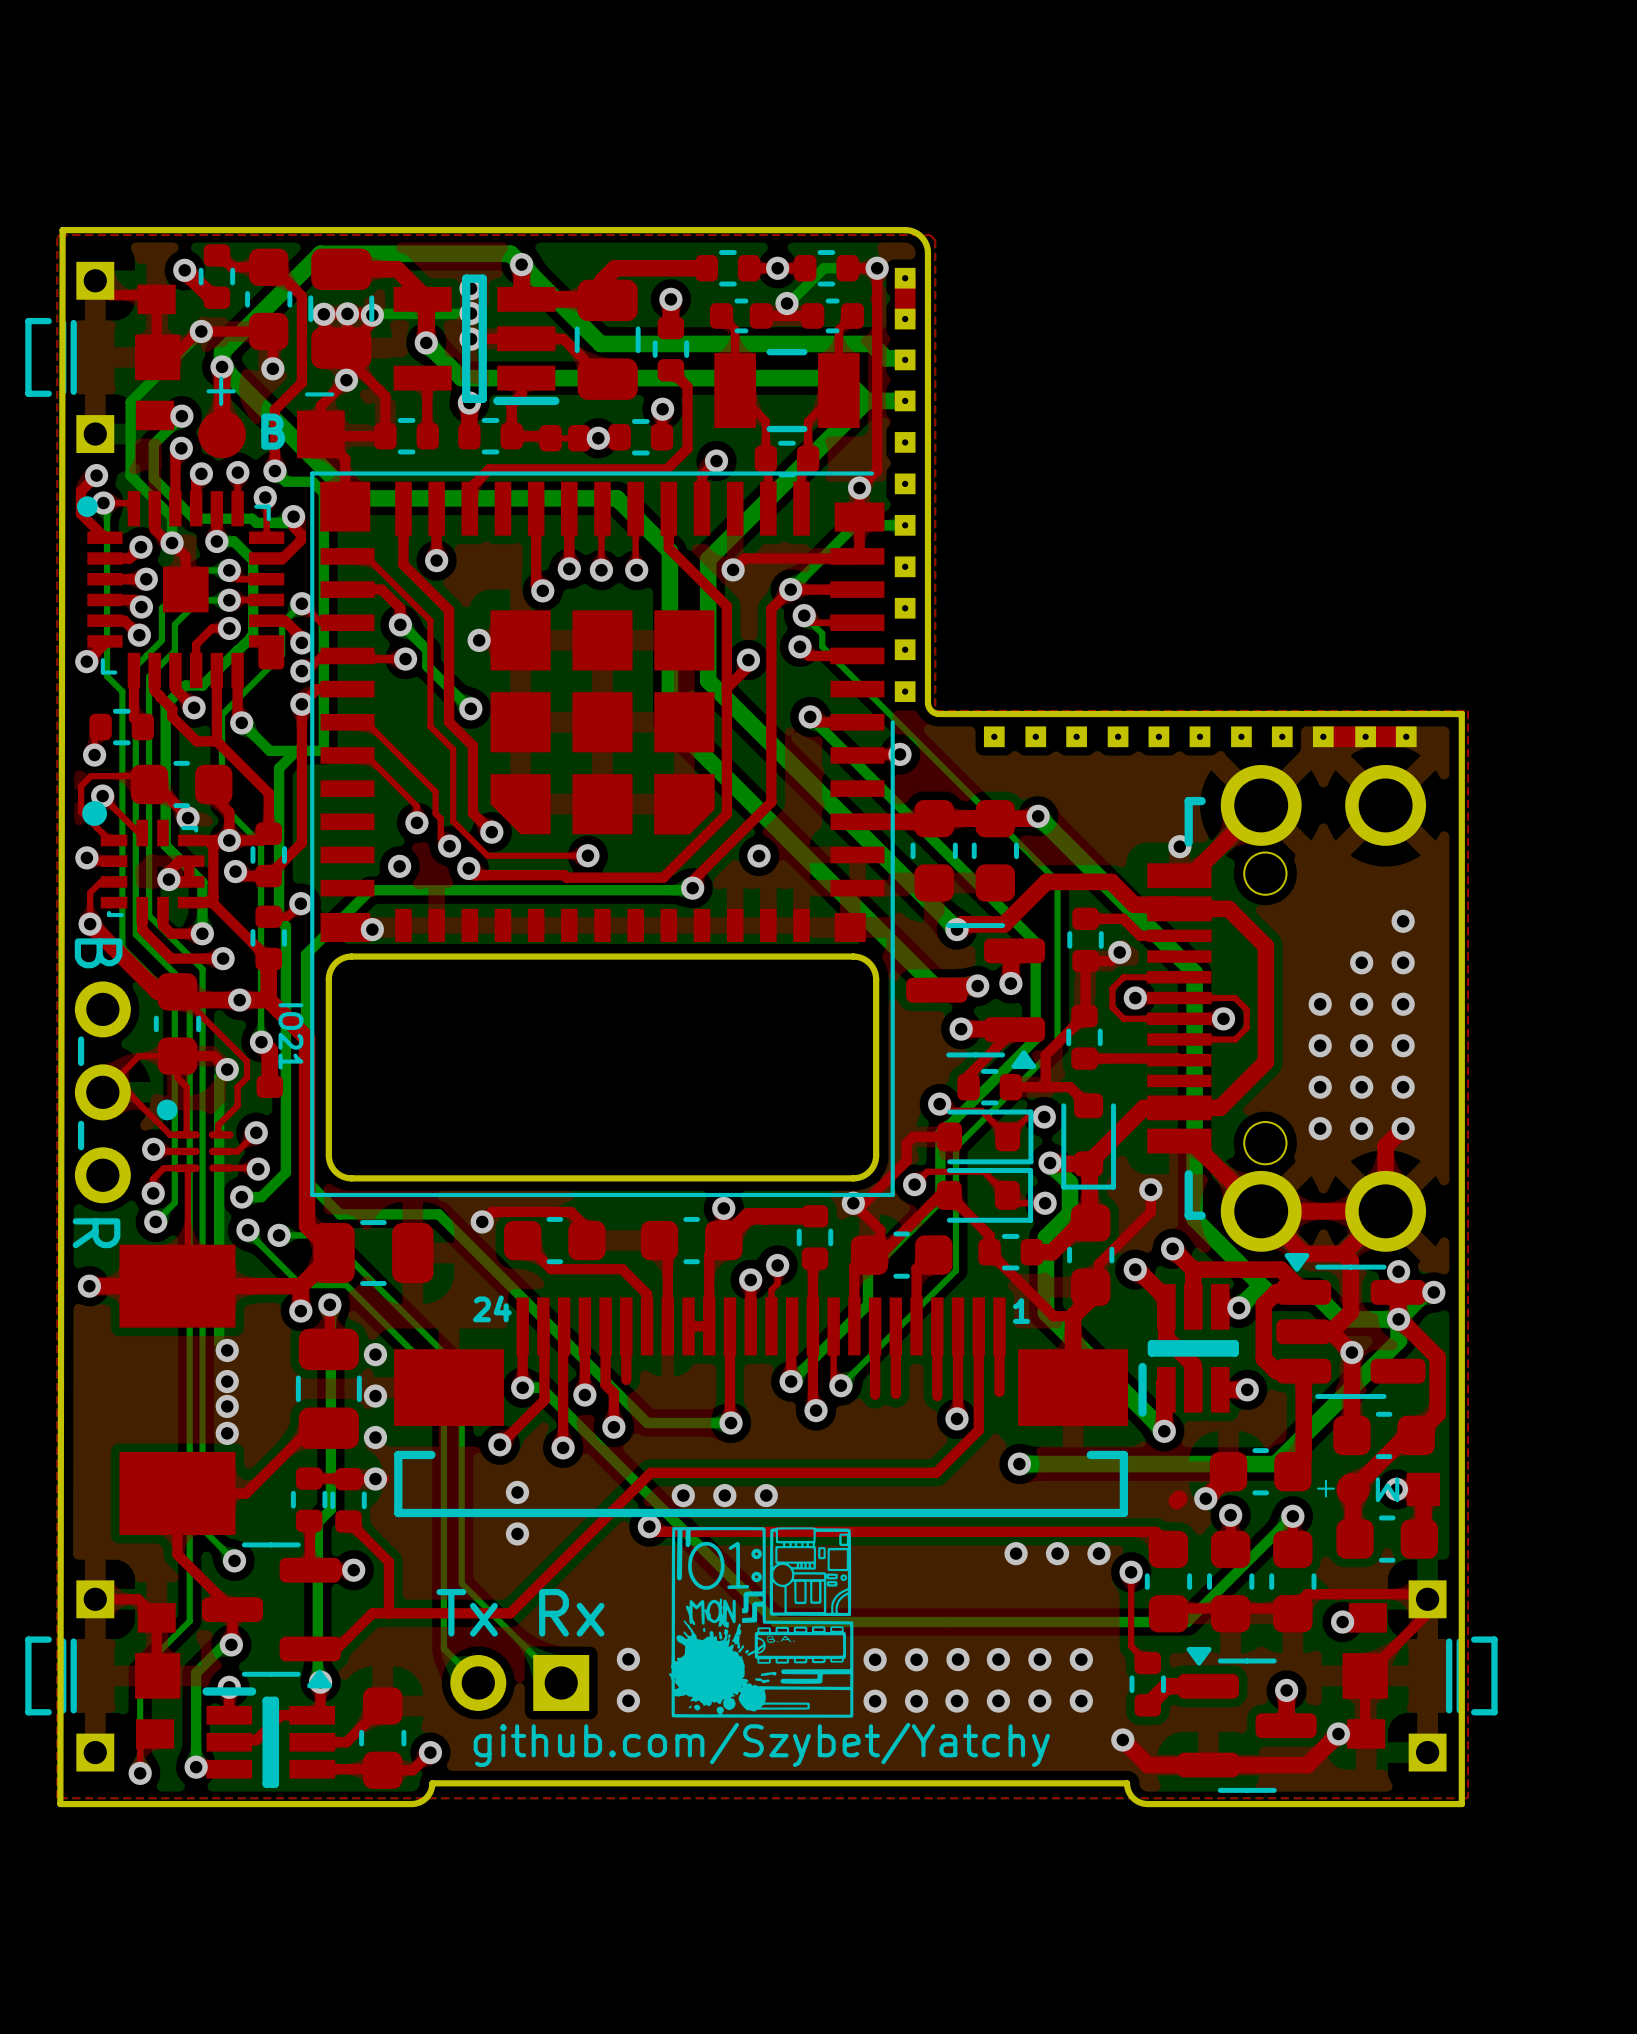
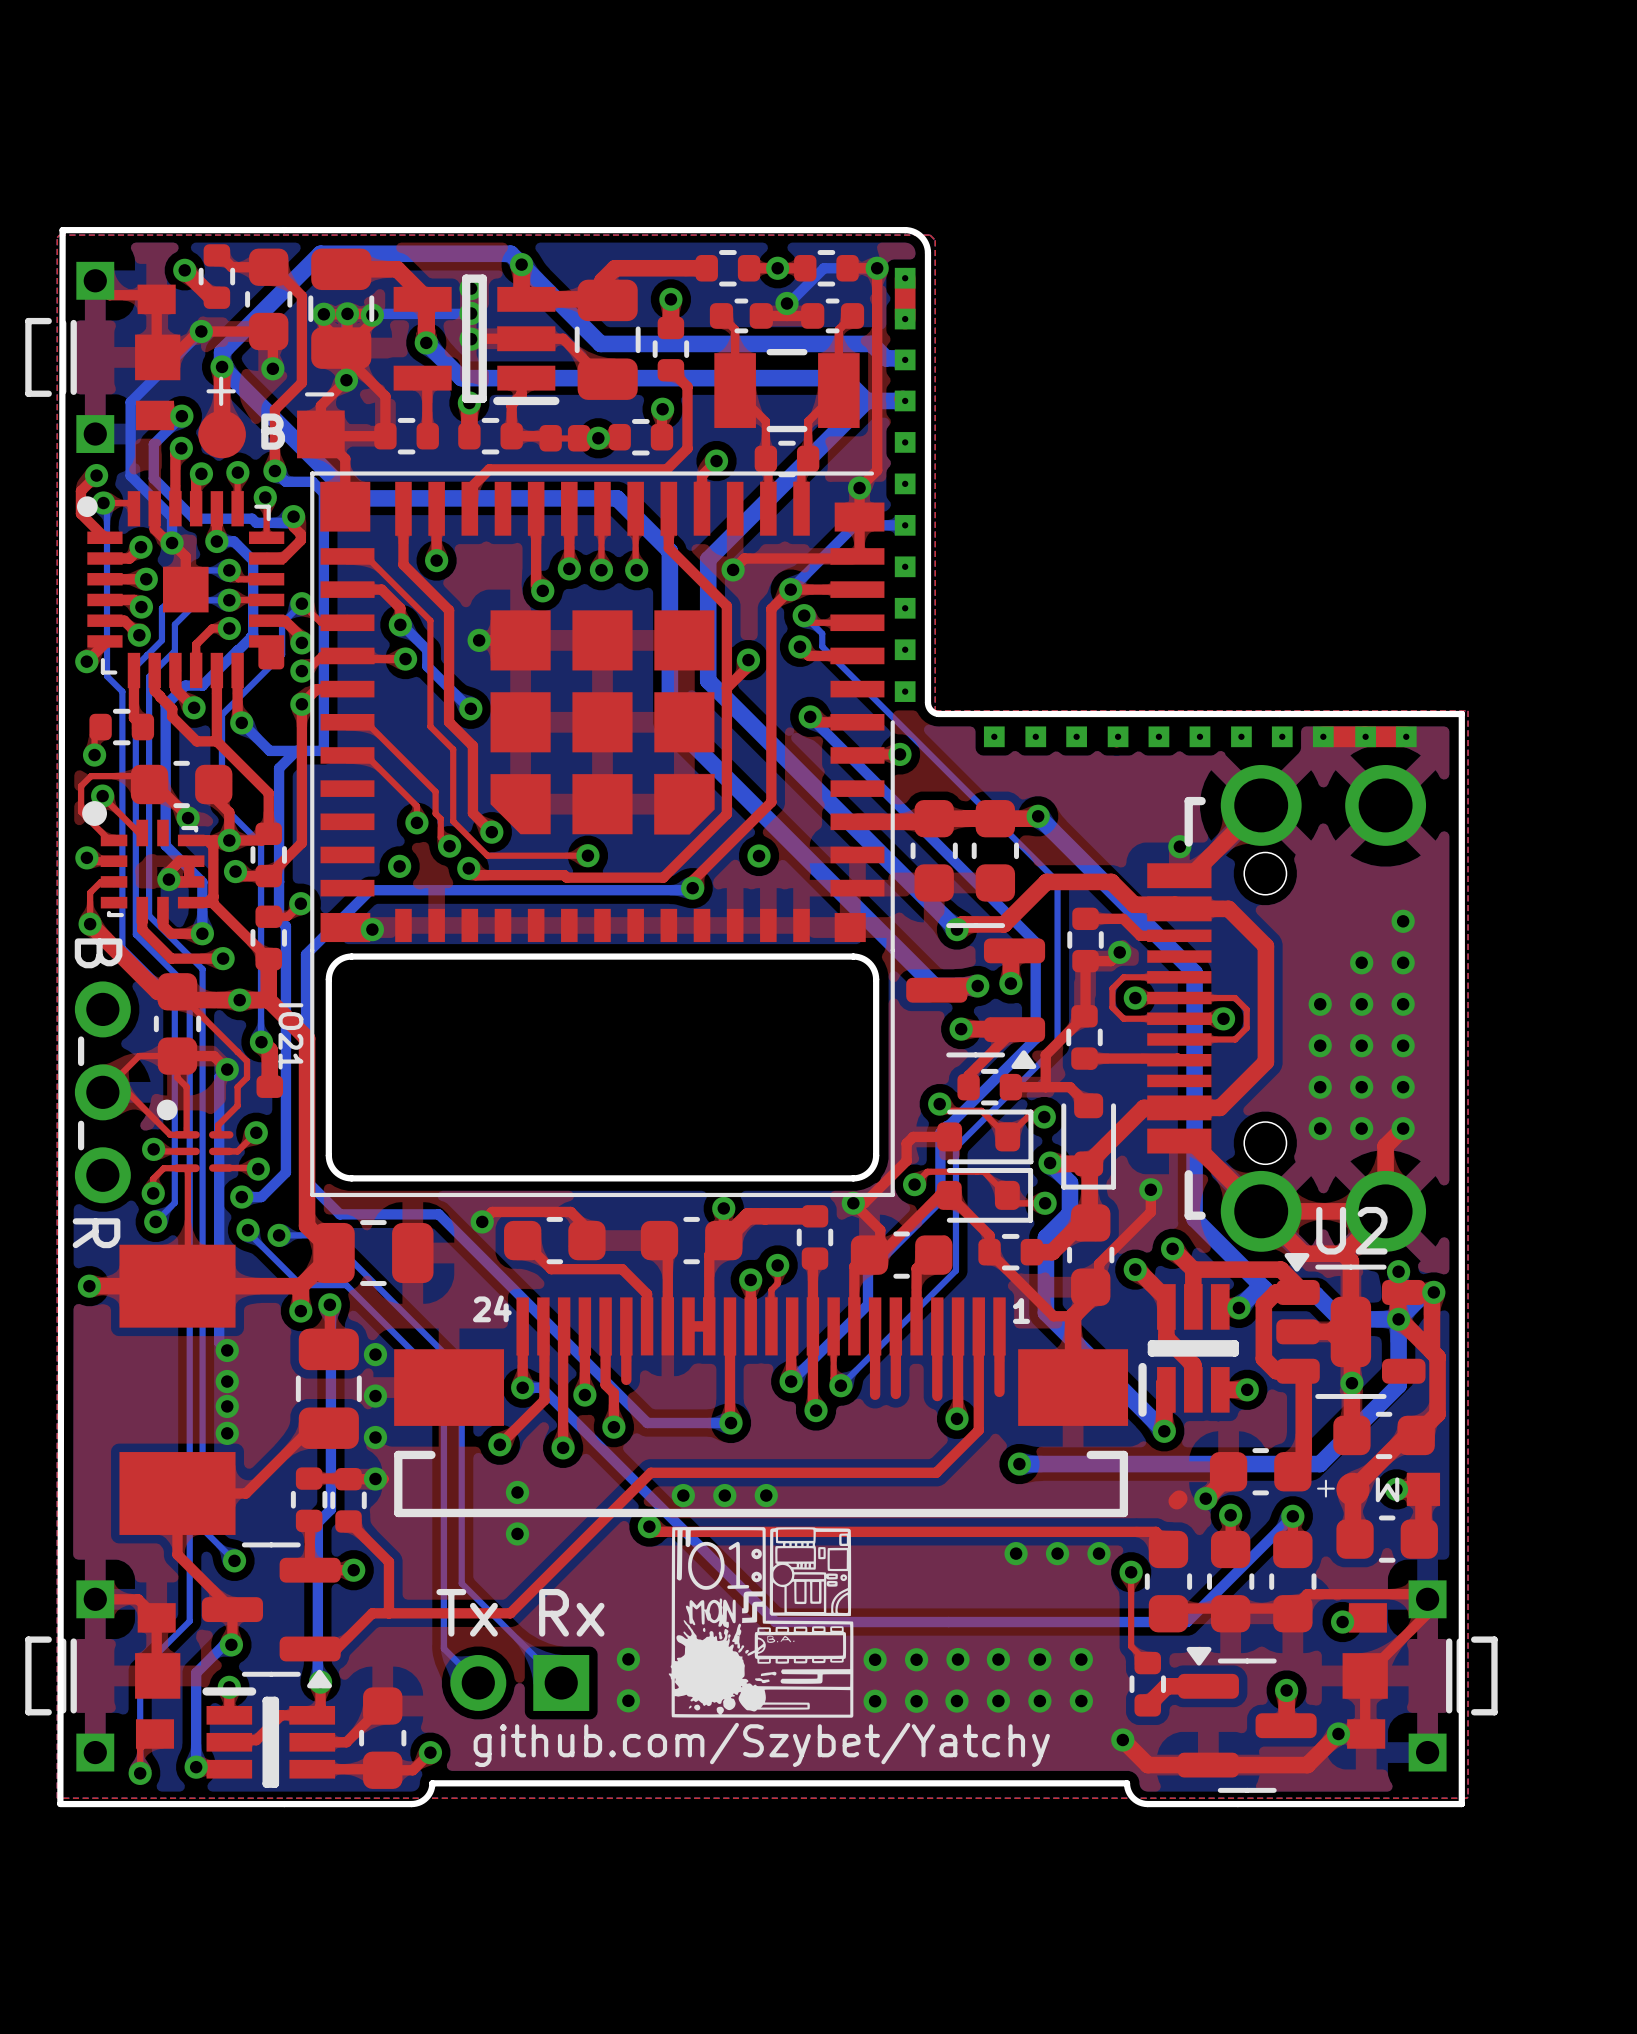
top track: none -> (1433, 1292) (1431, 1294) (1431, 1351)
part: (1350, 1325) -> none
U2: none -> (1350, 1325)
bottom track: (1398, 1341) (1275, 1464) -> (1398, 1341) (1398, 1385) (1320, 1464) (1275, 1464)
via position: (1351, 1352) -> (1351, 1383)

